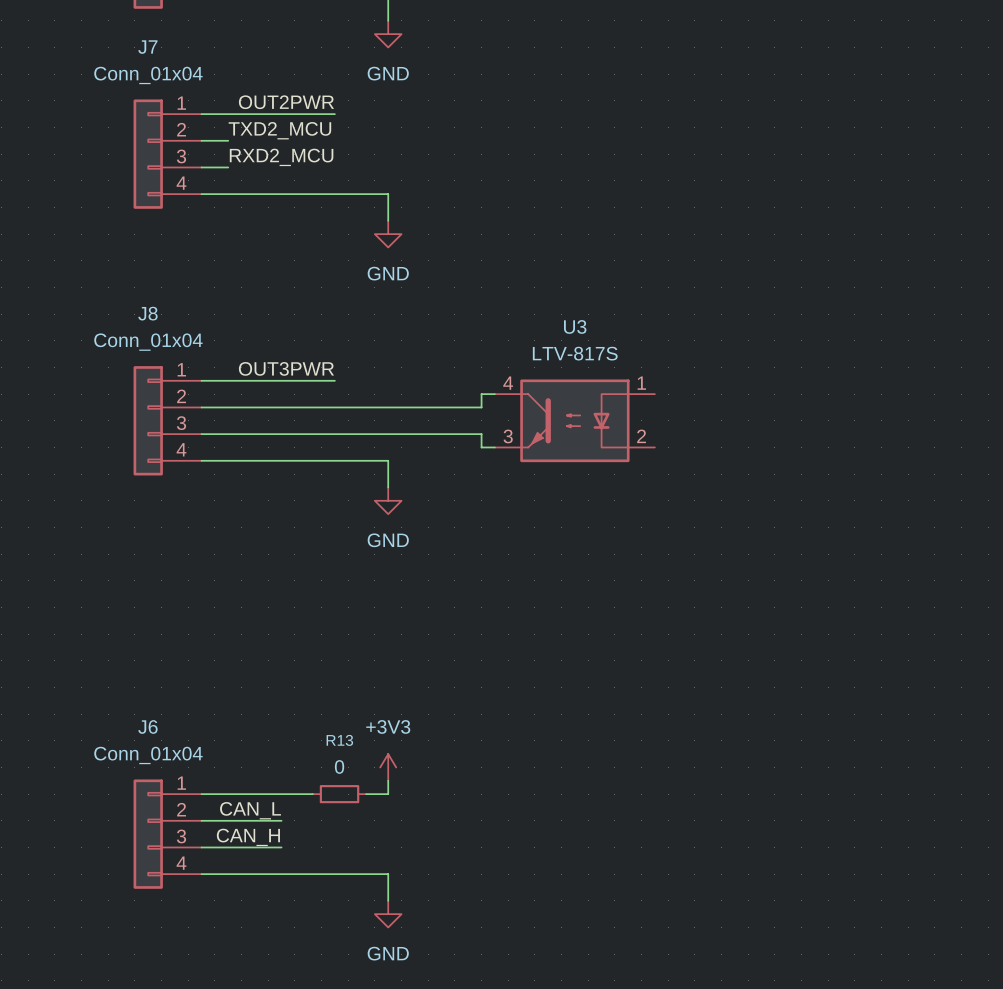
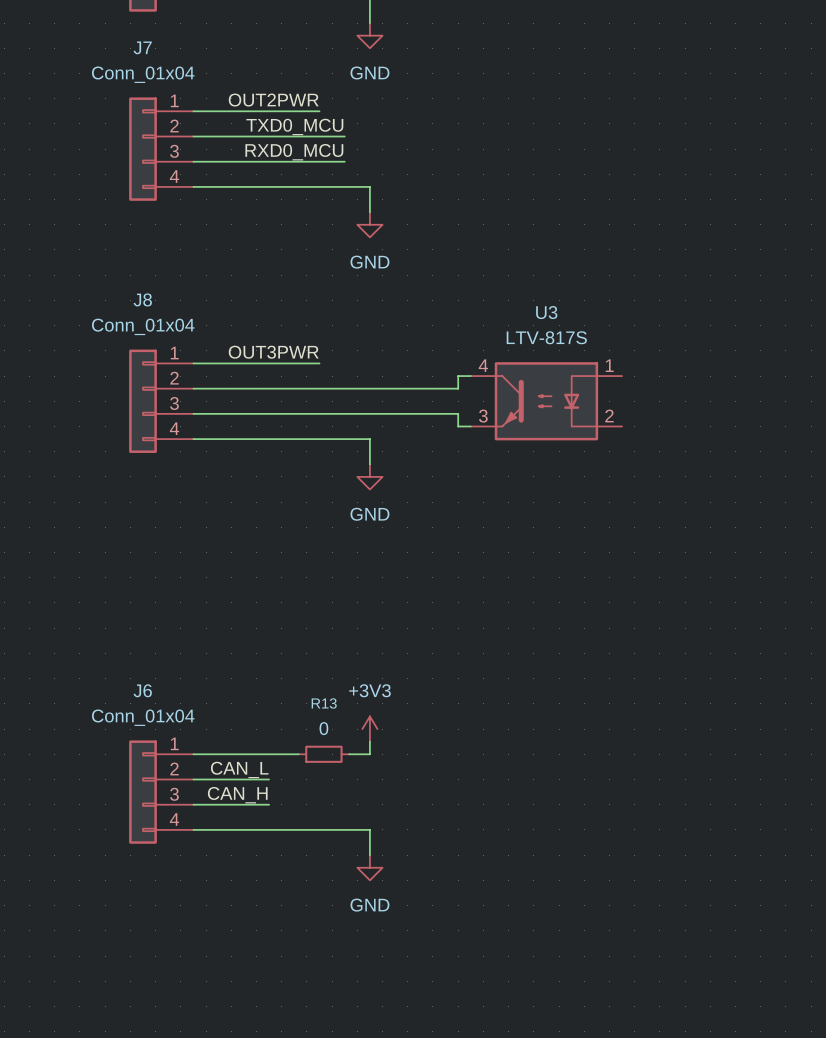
label: TXD2_MCU (279, 130) -> none
label: none -> TXD0_MCU (294, 126)
wire: none -> (218, 136) (344, 136)
label: RXD2_MCU (281, 157) -> none
label: none -> RXD0_MCU (294, 152)
wire: none -> (218, 161) (344, 161)

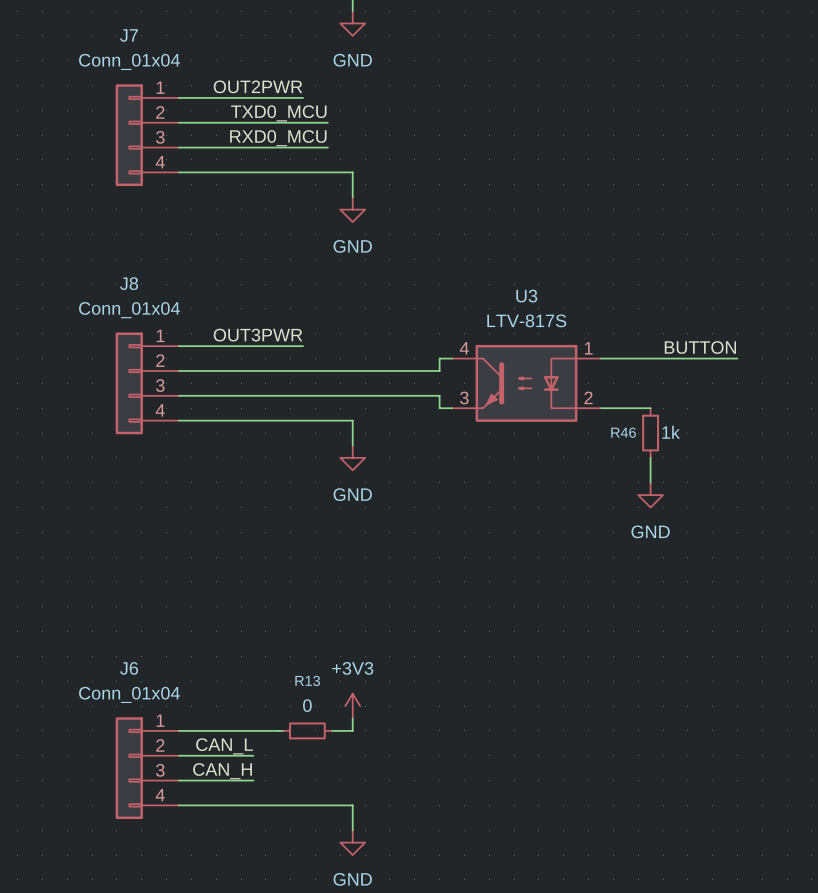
label: none -> BUTTON (700, 347)
wire: none -> (600, 358) (737, 358)
wire: none -> (600, 408) (650, 408)
R46: none -> 1k (650, 433)
wire: none -> (650, 457) (650, 482)
power symbol: none -> GND (650, 495)

